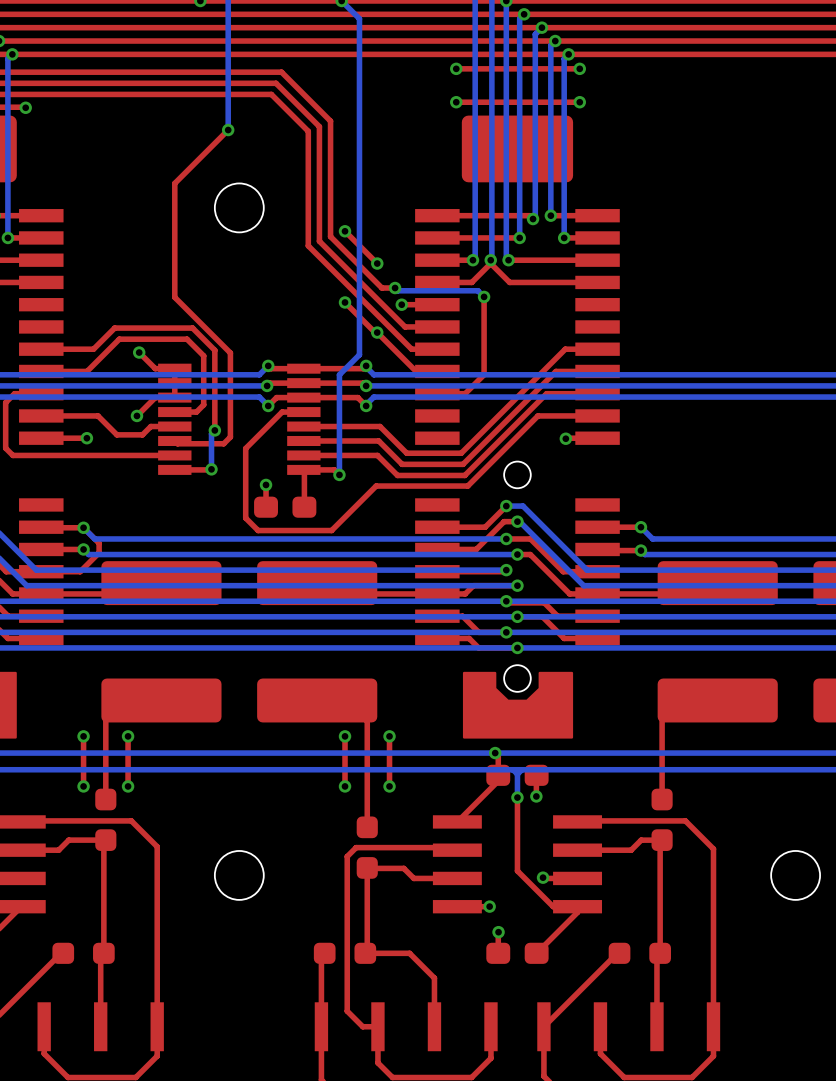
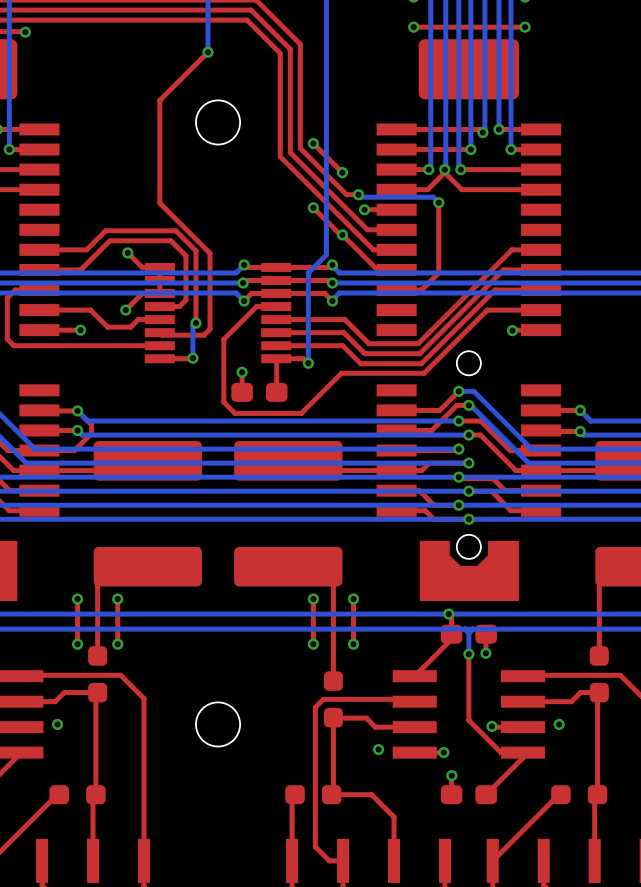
via: none -> (57, 724)
via: none -> (559, 724)
via: none -> (378, 749)

